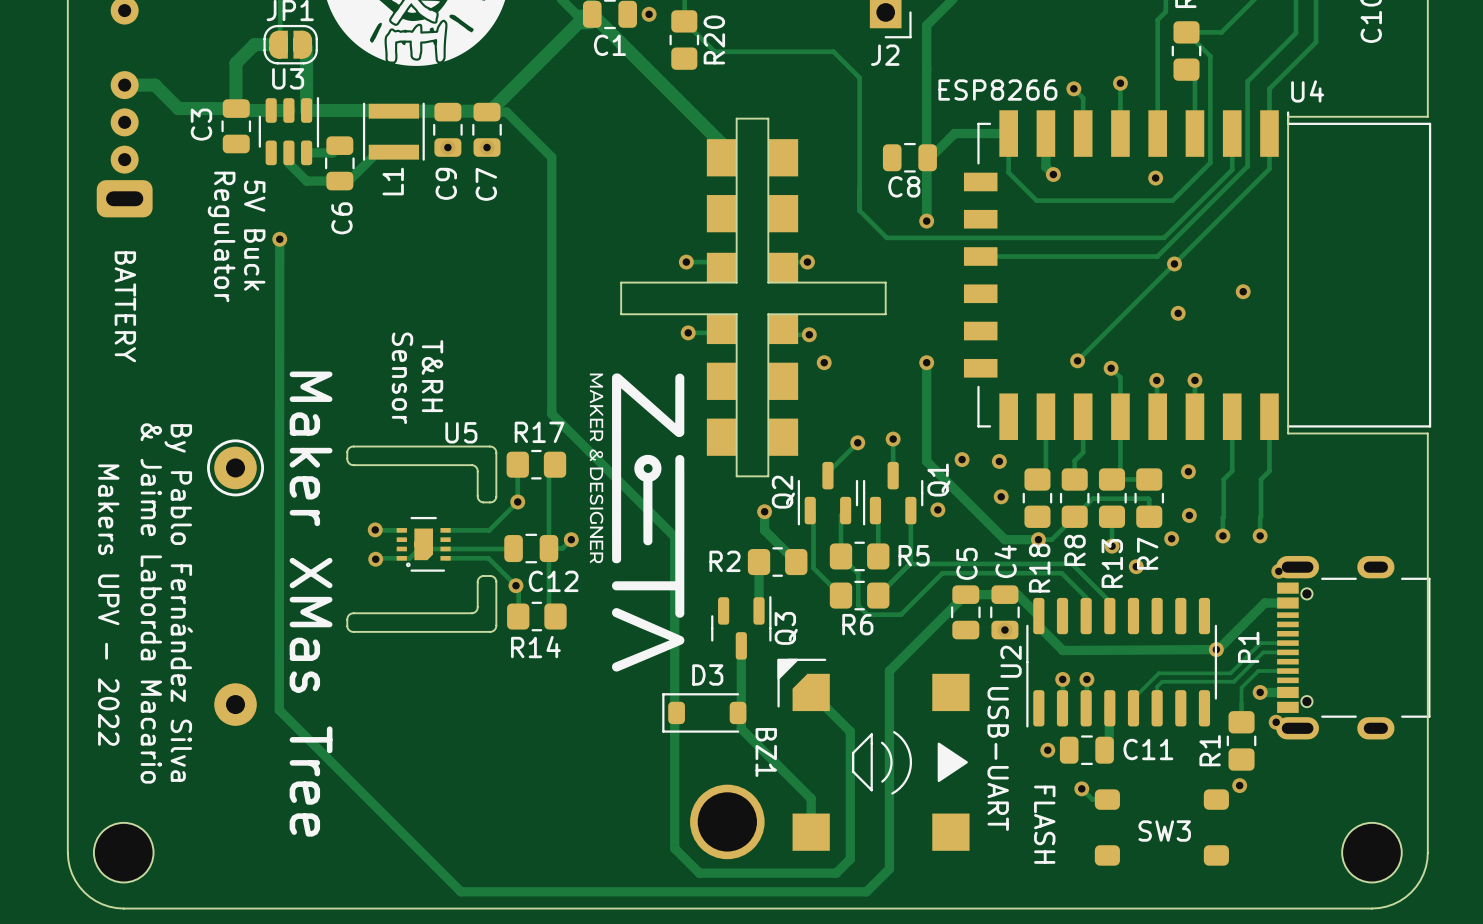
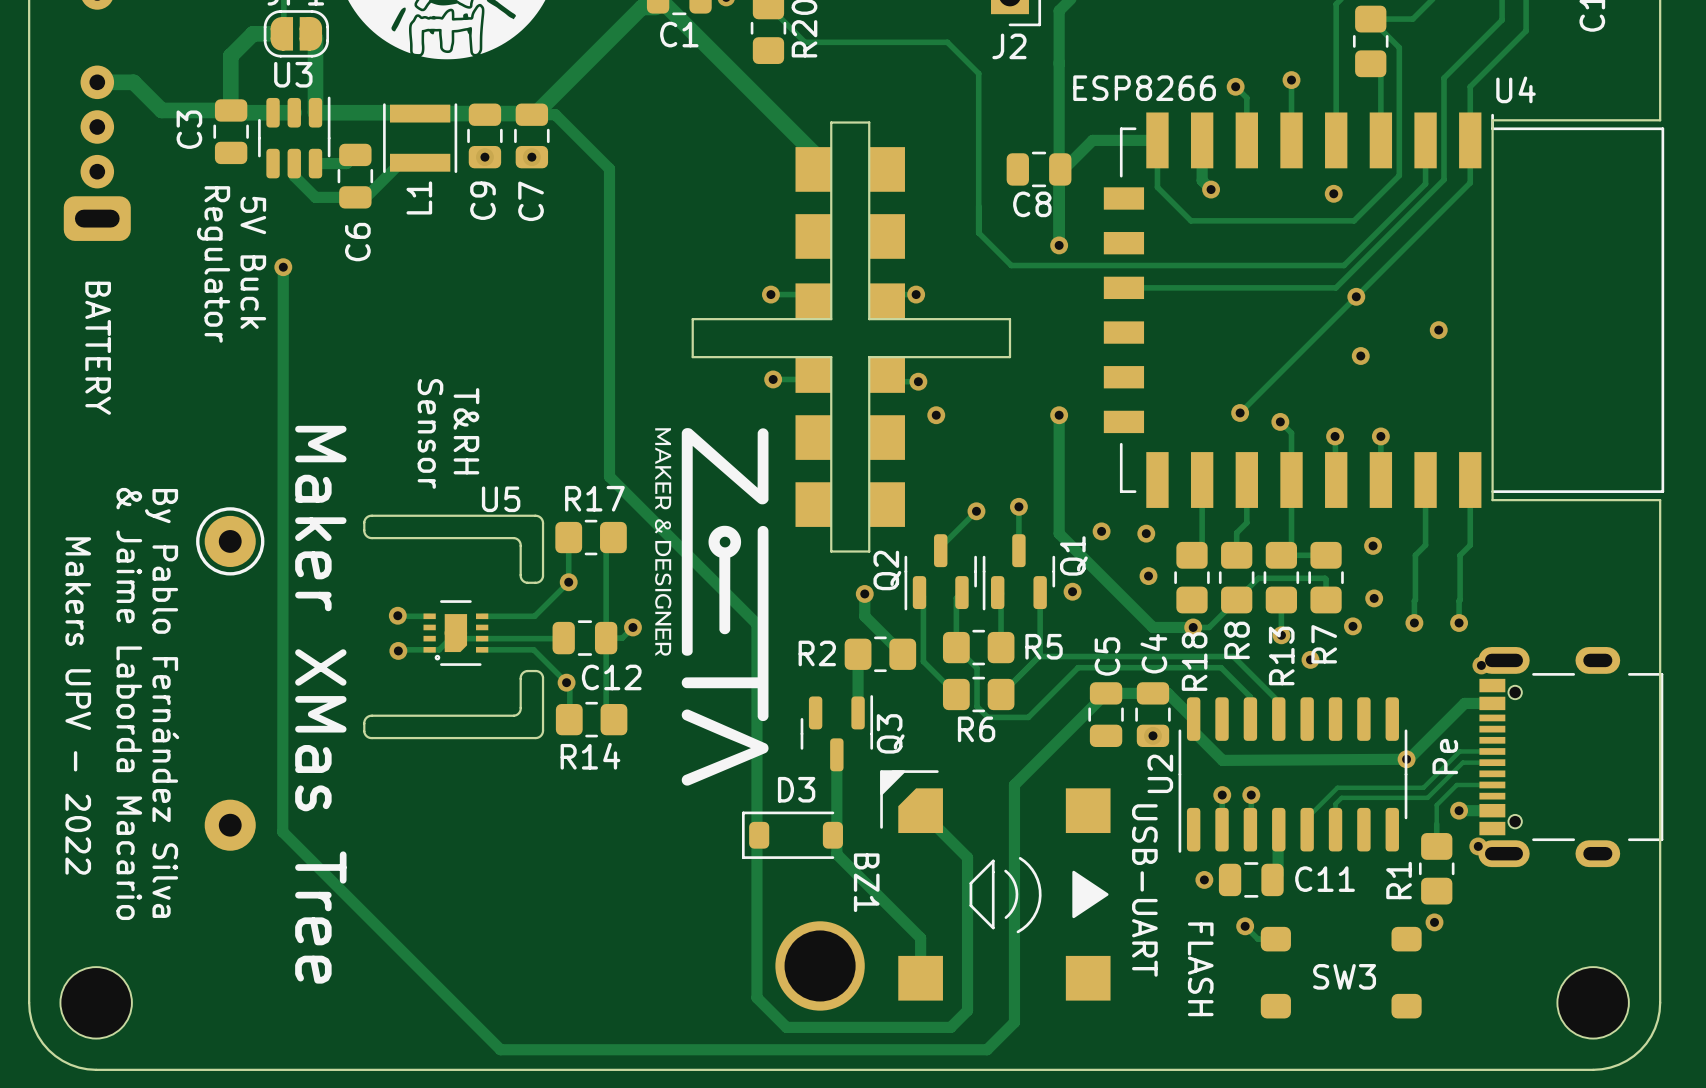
P1 name: P1 (1248, 647) -> Pe (1445, 756)

